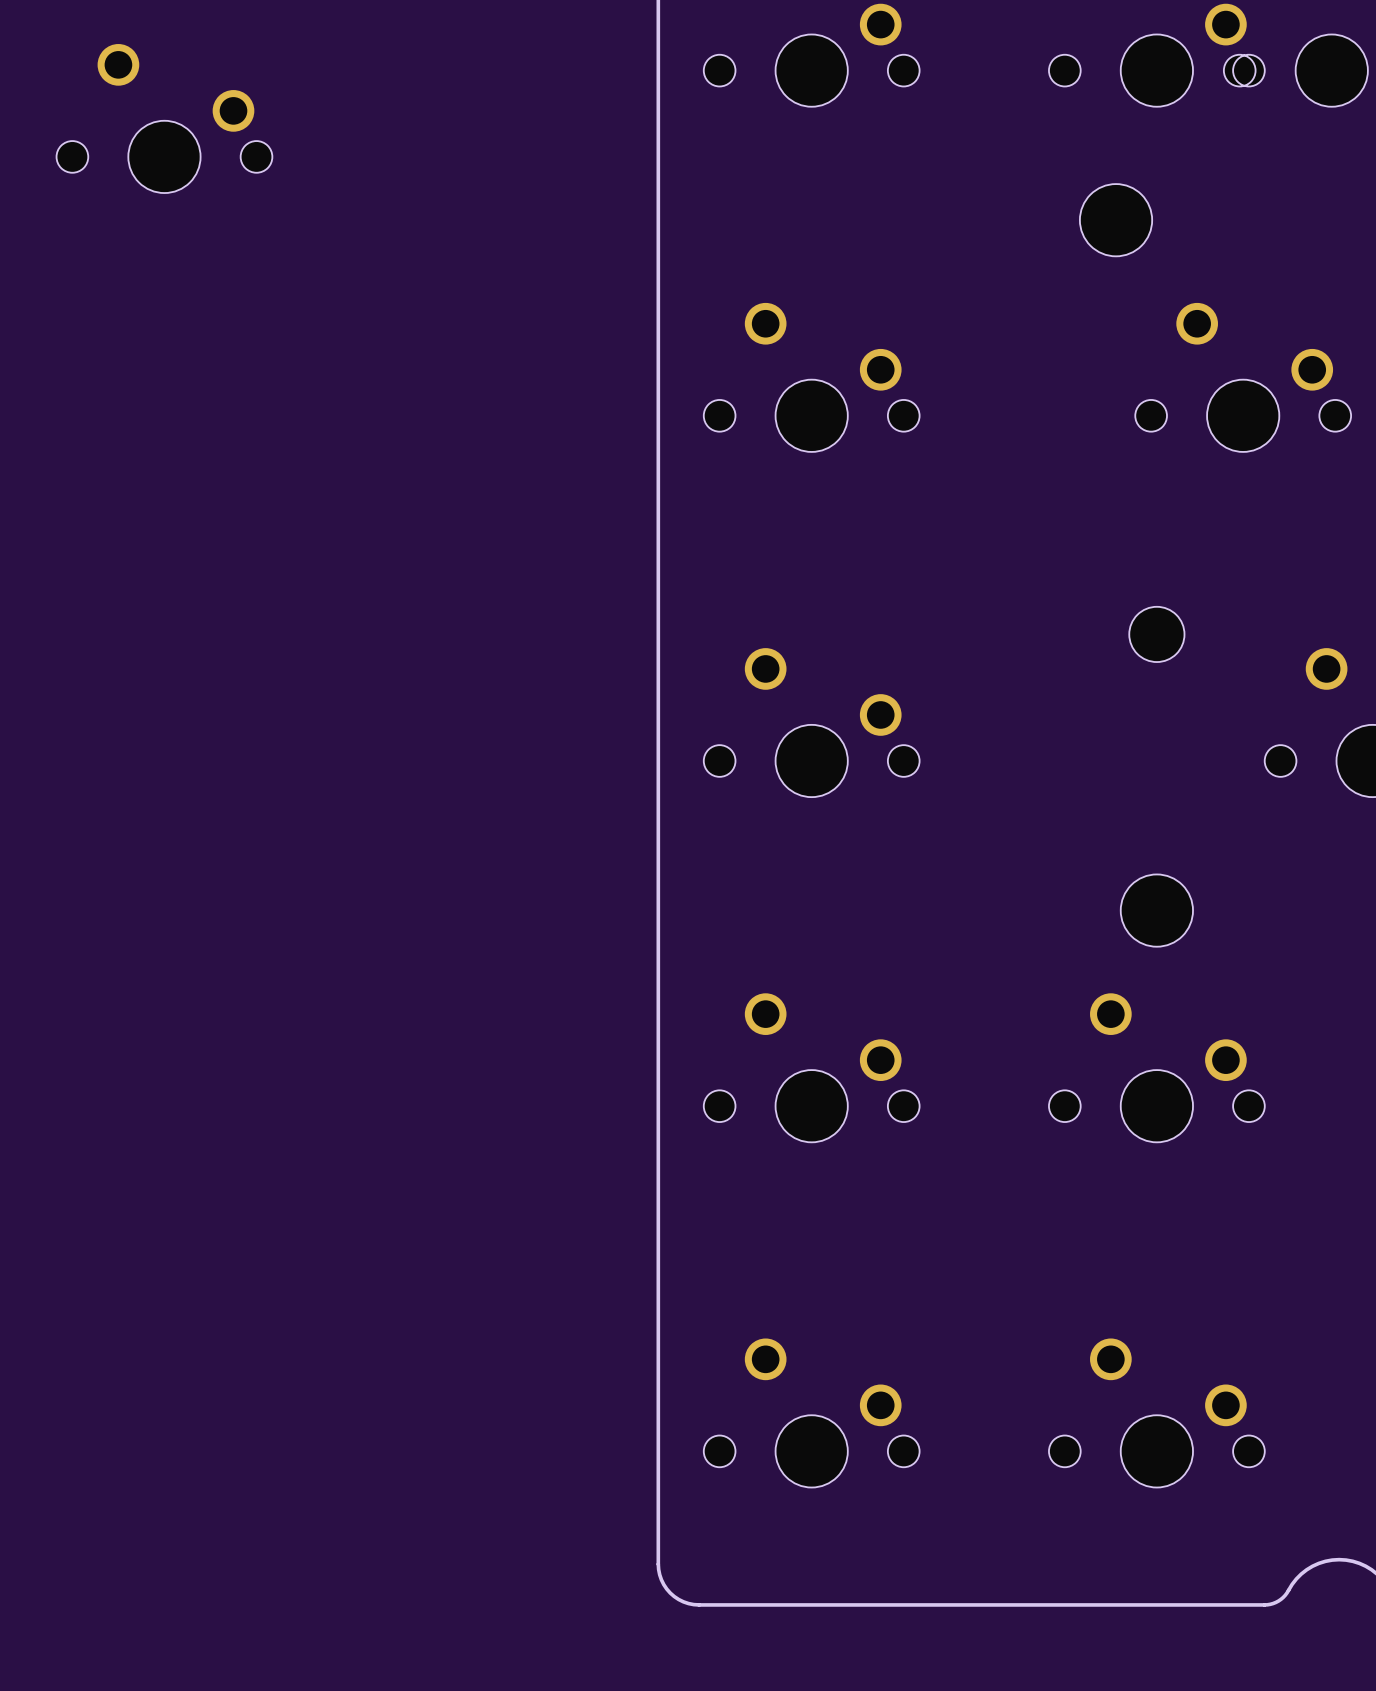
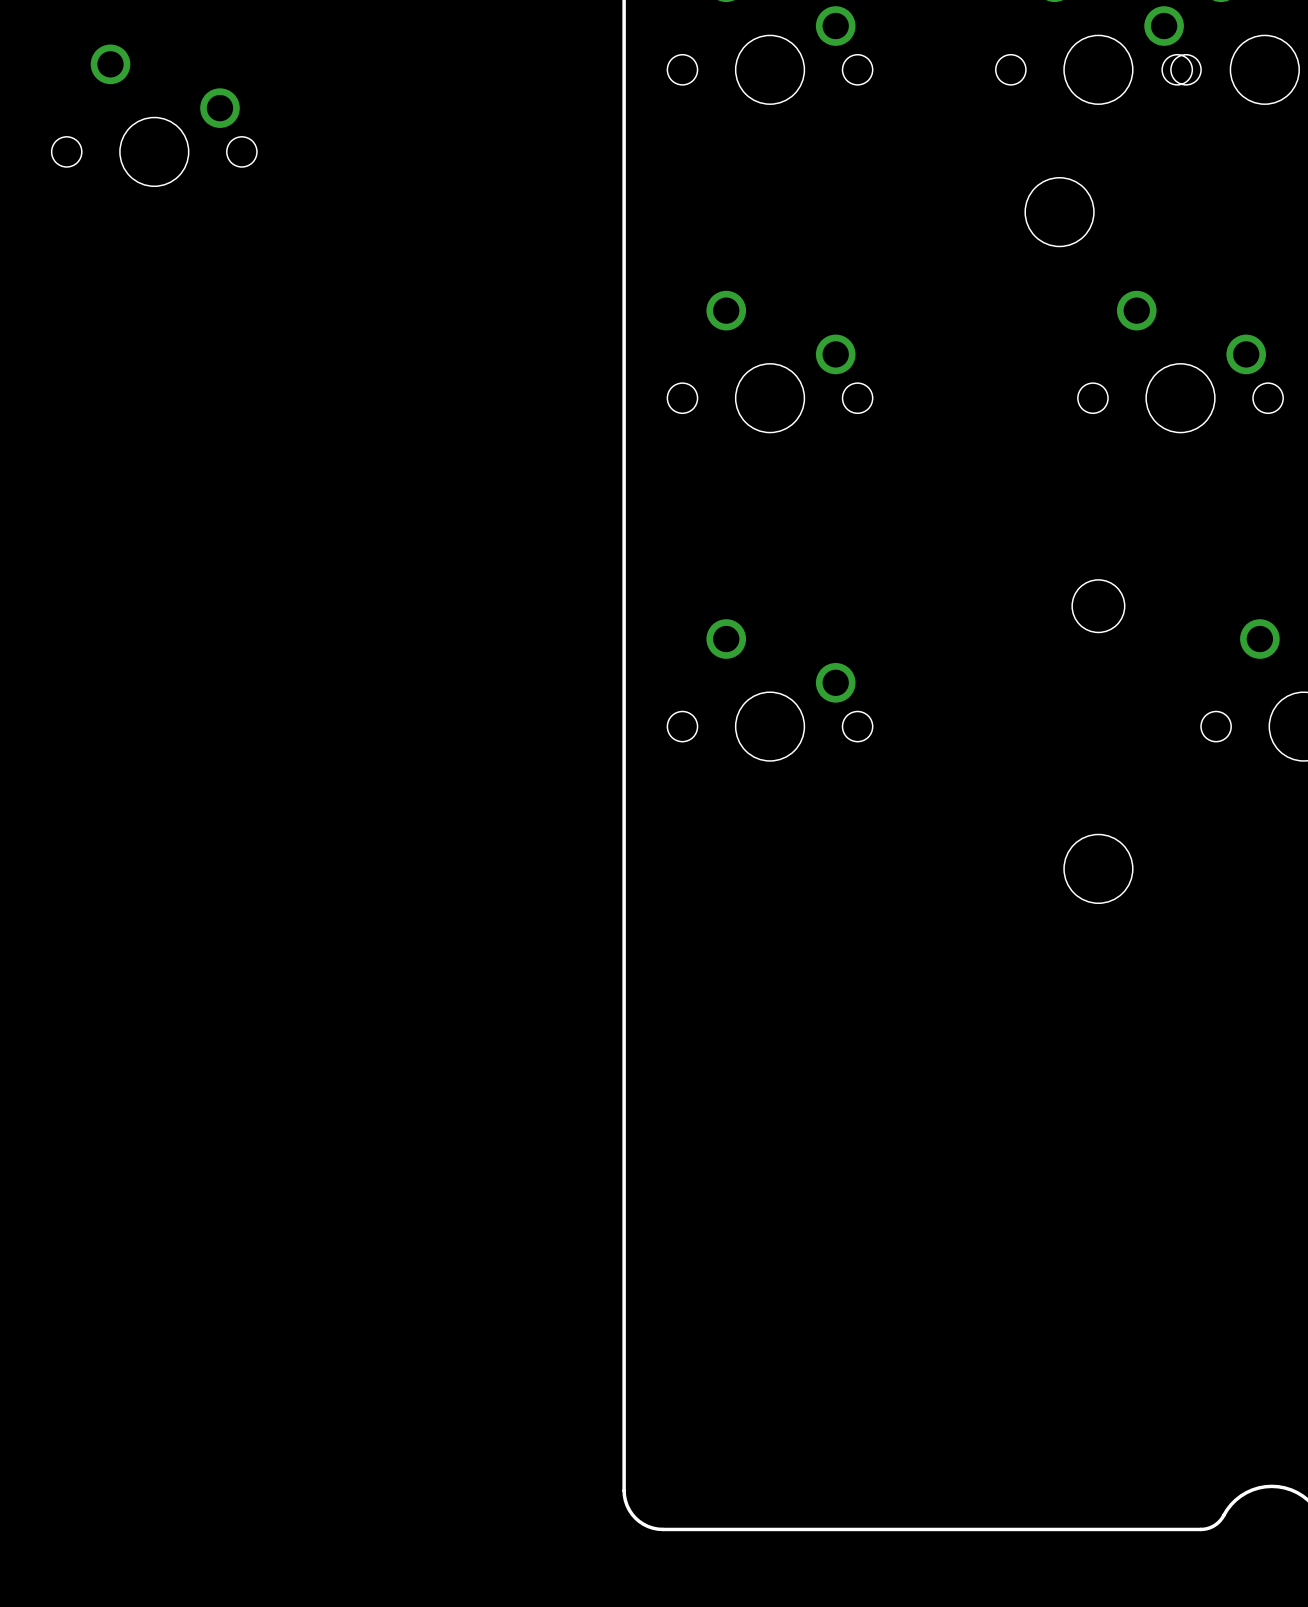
part: (811, 1067) -> none
part: (1156, 1067) -> none
part: (811, 1413) -> none
part: (1156, 1413) -> none

